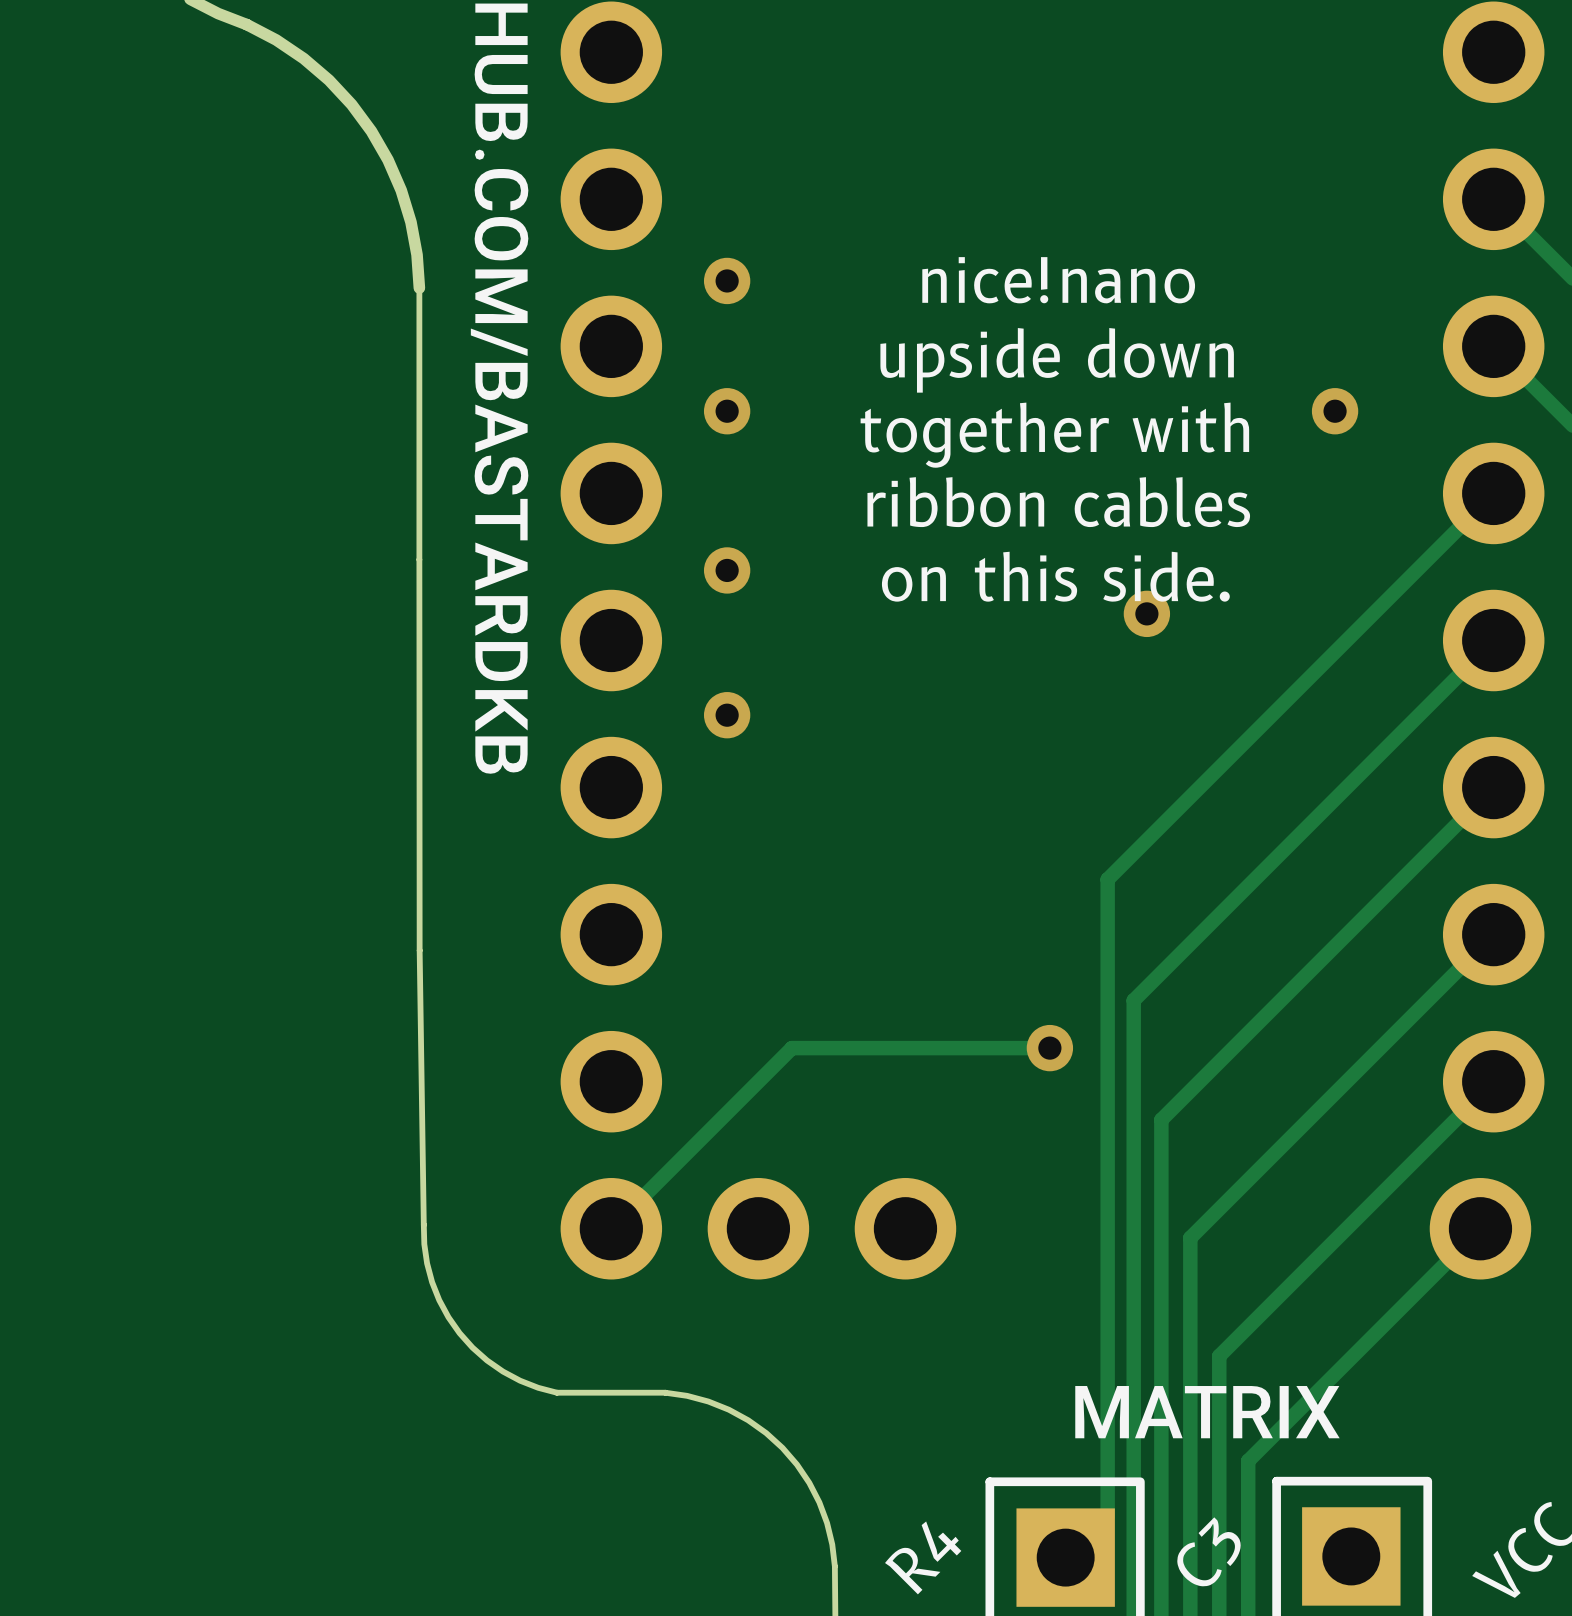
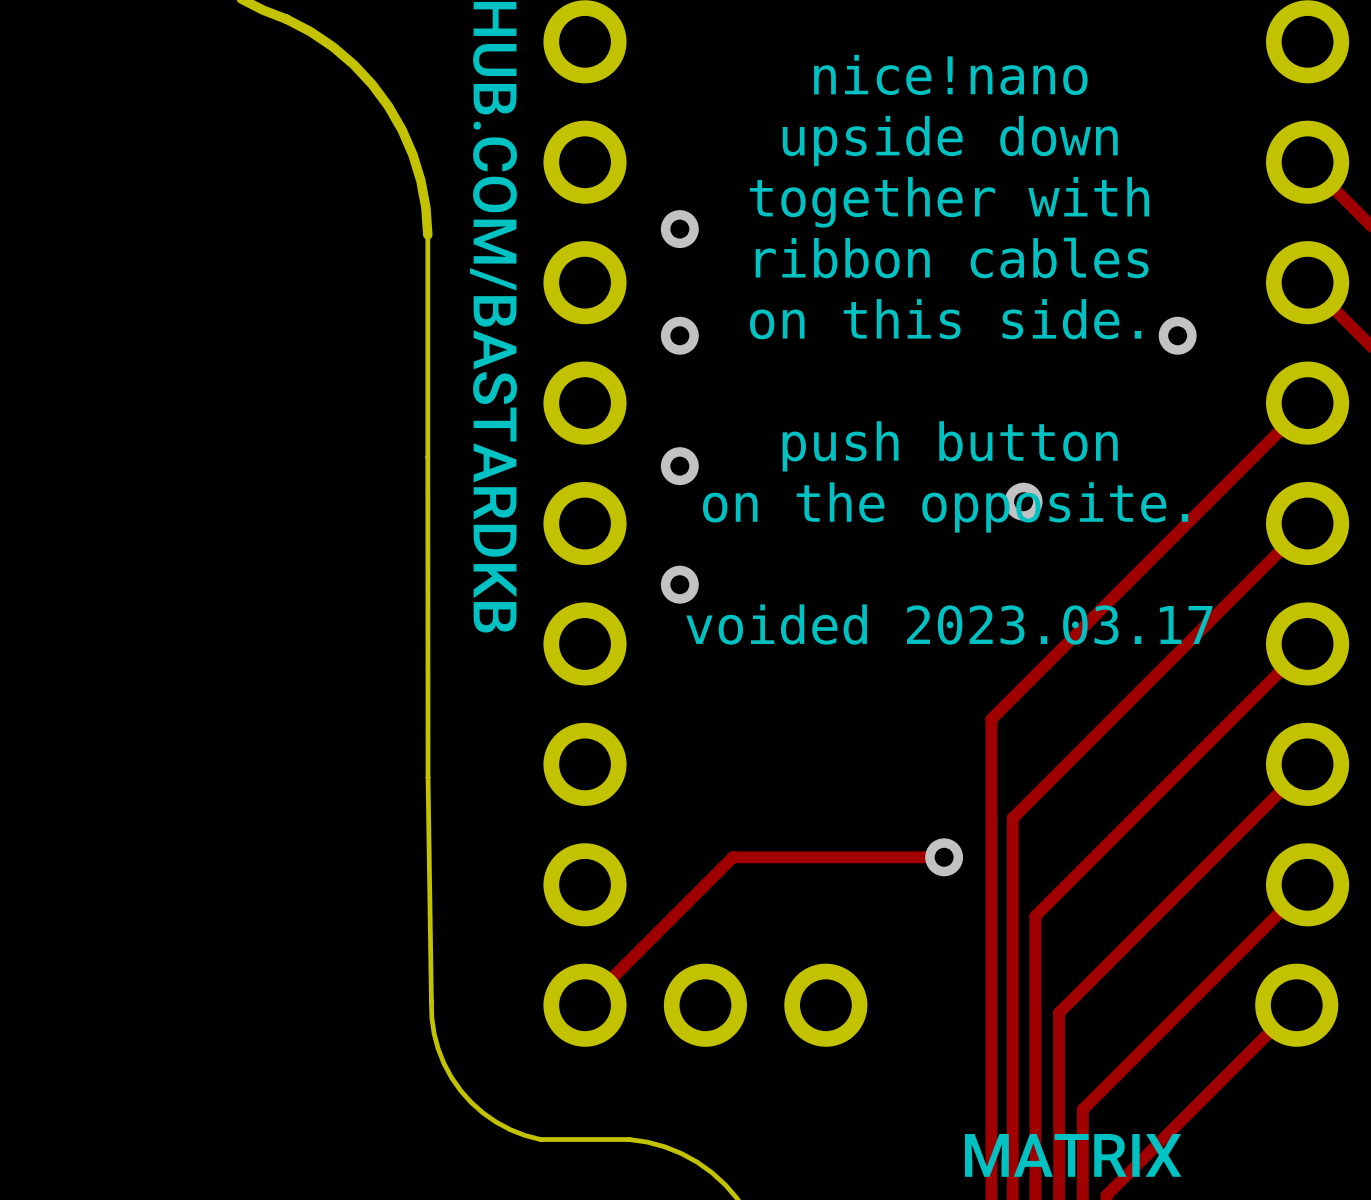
text position: nice!nano (1058, 280) -> nice!nano (950, 74)
text position: upside down (1057, 360) -> upside down (950, 141)
text position: together with (1054, 435) -> together with (949, 202)
text position: ribbon cables (1058, 502) -> ribbon cables (952, 257)
text: none -> push button (950, 446)
text position: on this side. (1055, 576) -> on this side. (945, 319)
text: none -> on the opposite. (945, 507)
text: none -> voided 2023.03.17 (949, 624)

